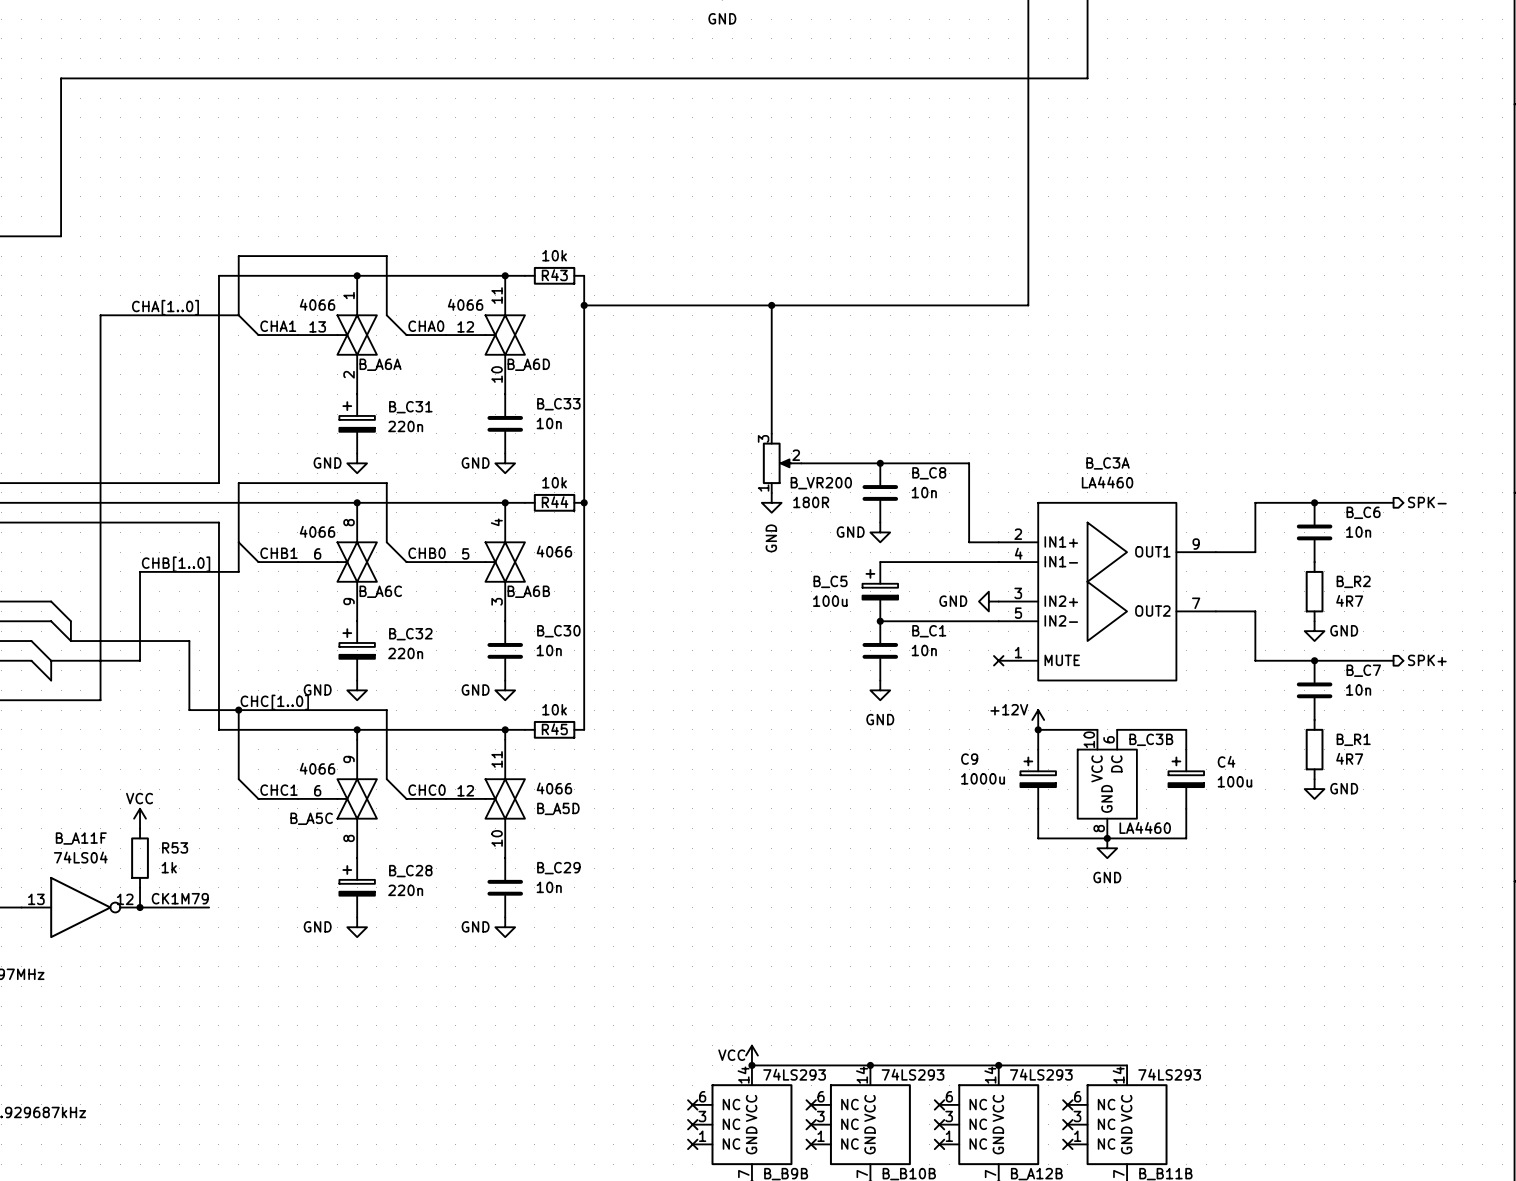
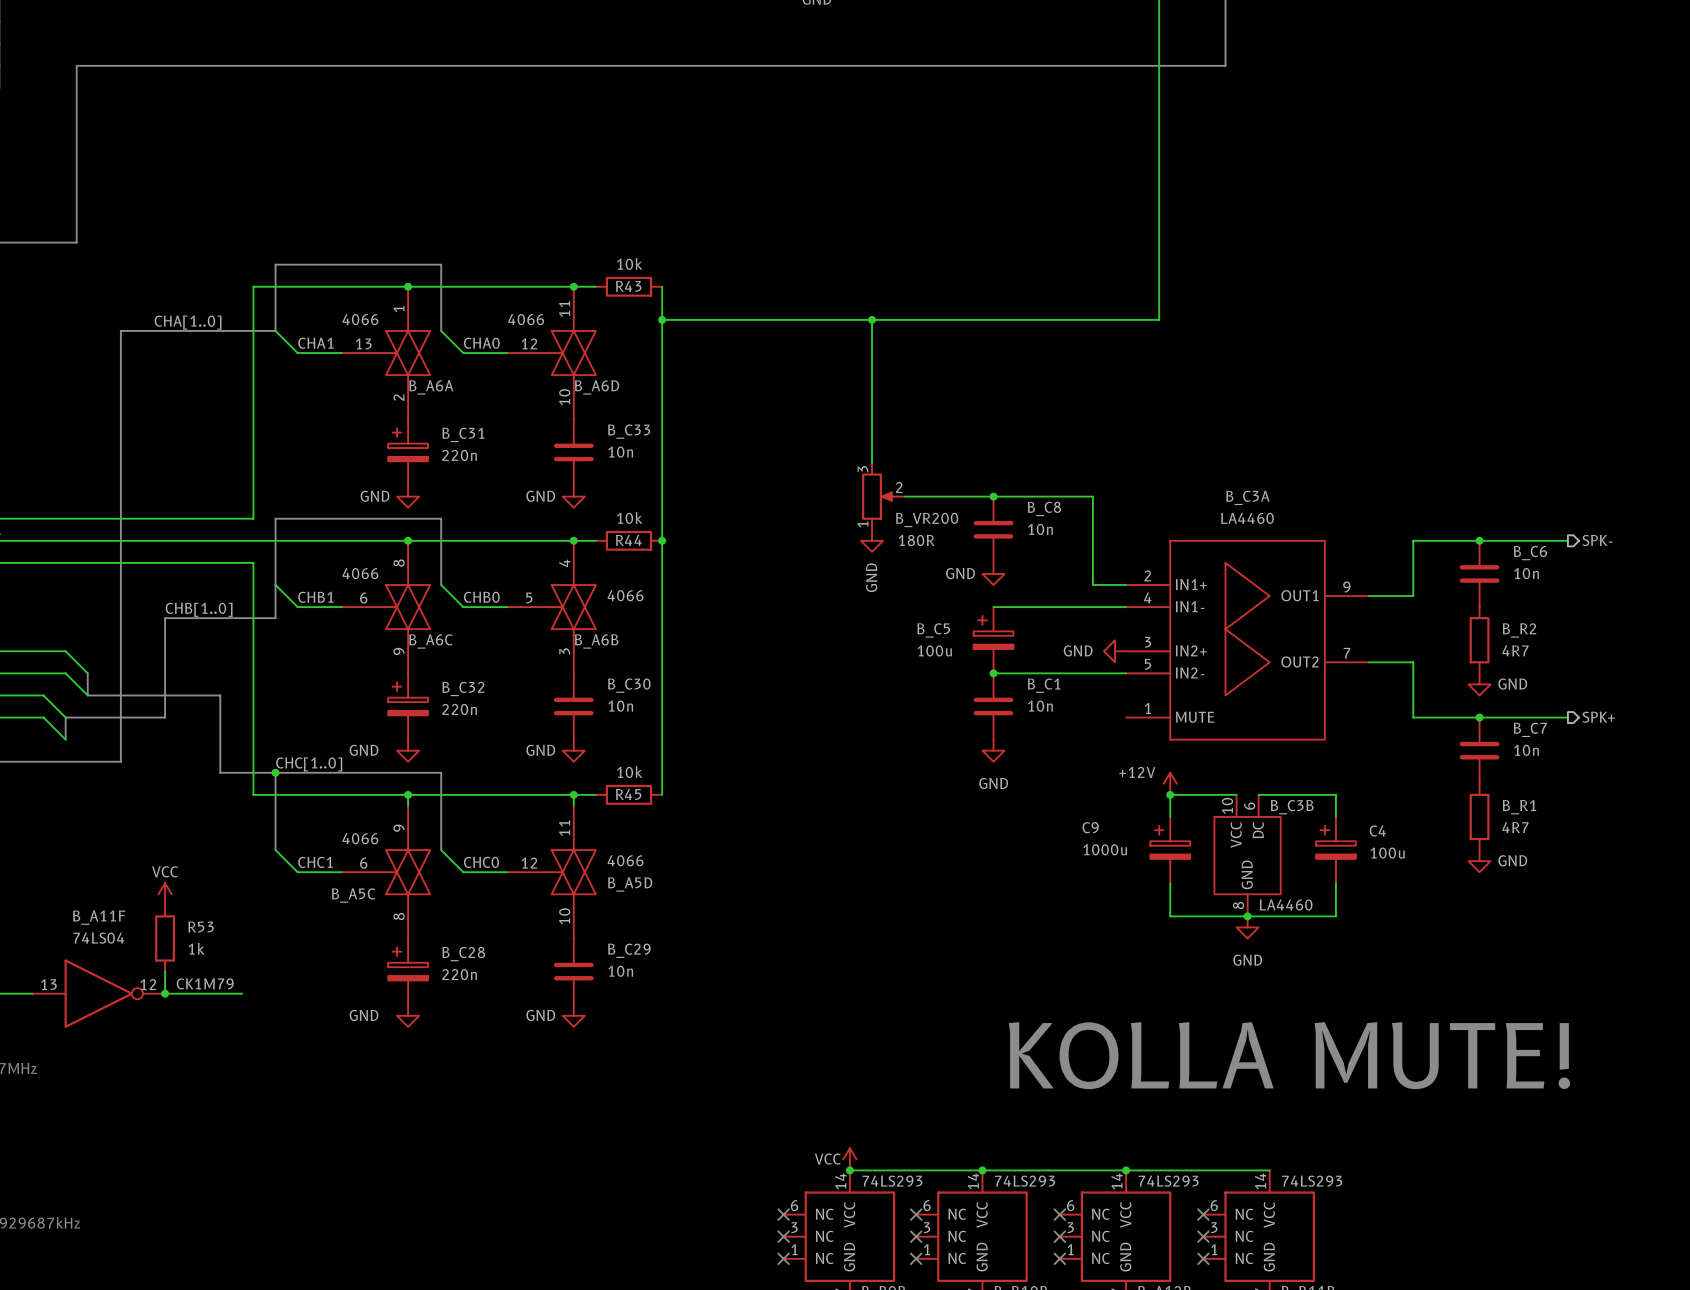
no-connect mark: (998, 660) -> none
text: none -> KOLLA MUTE! (1289, 1055)

